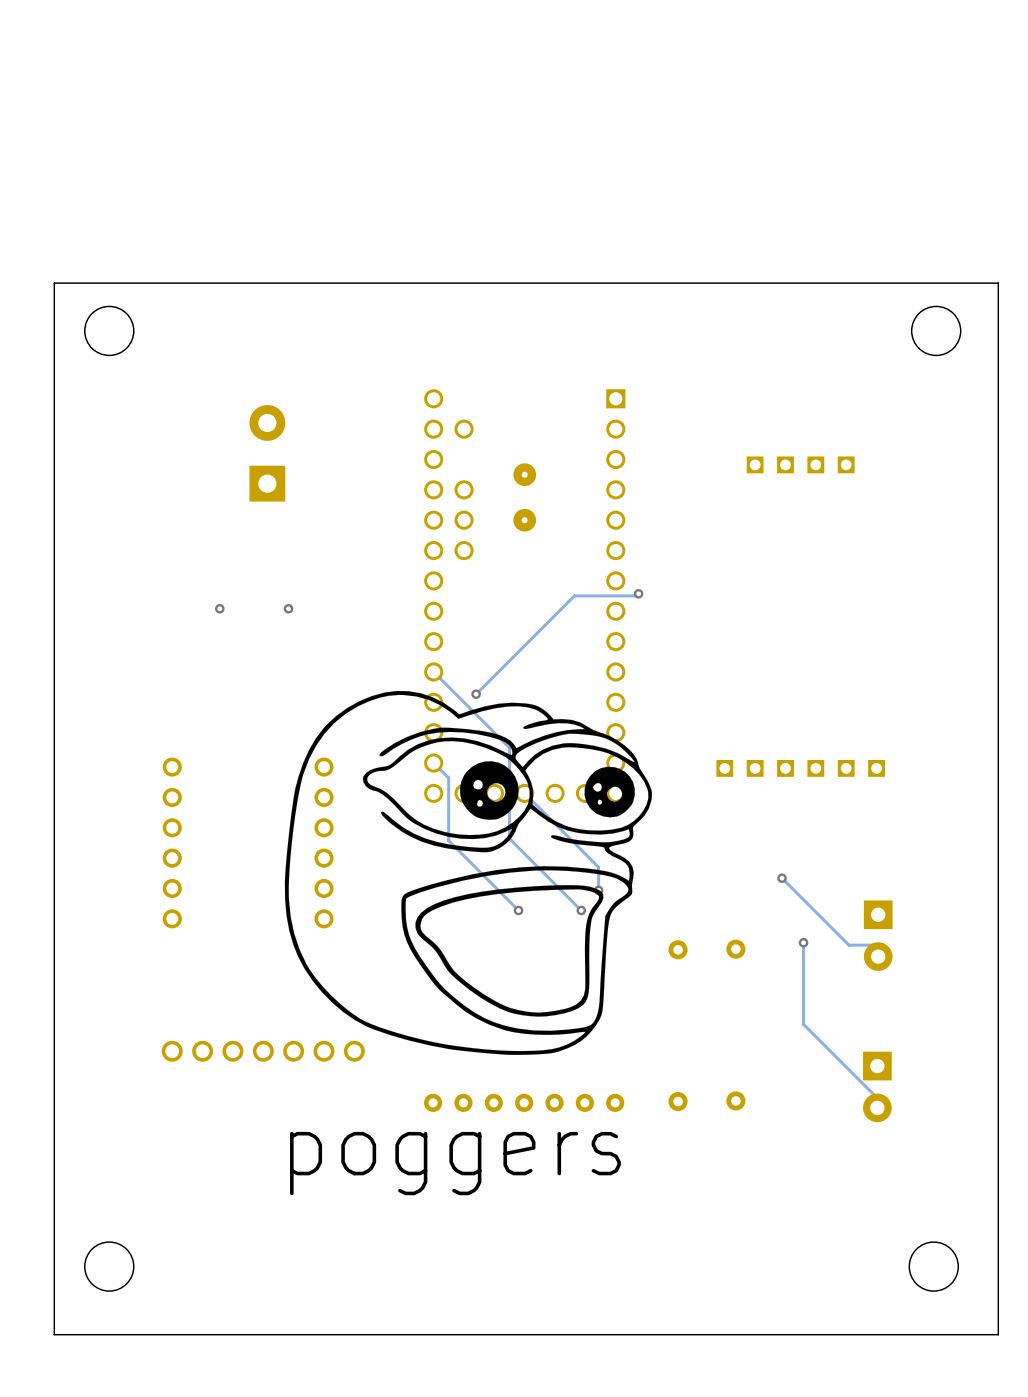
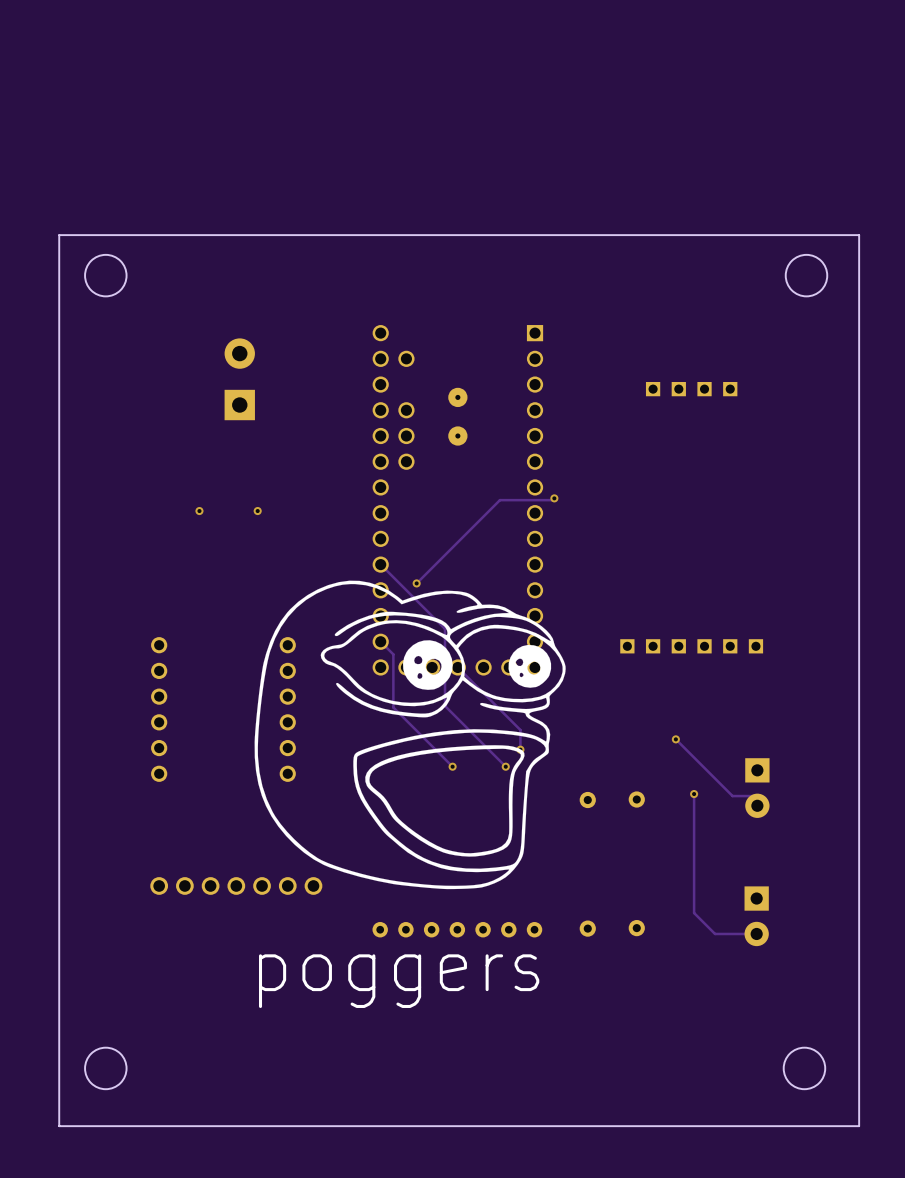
track: (803, 1024) (877, 1096) -> (694, 863) (694, 913) (715, 933) (746, 933) (756, 924)

